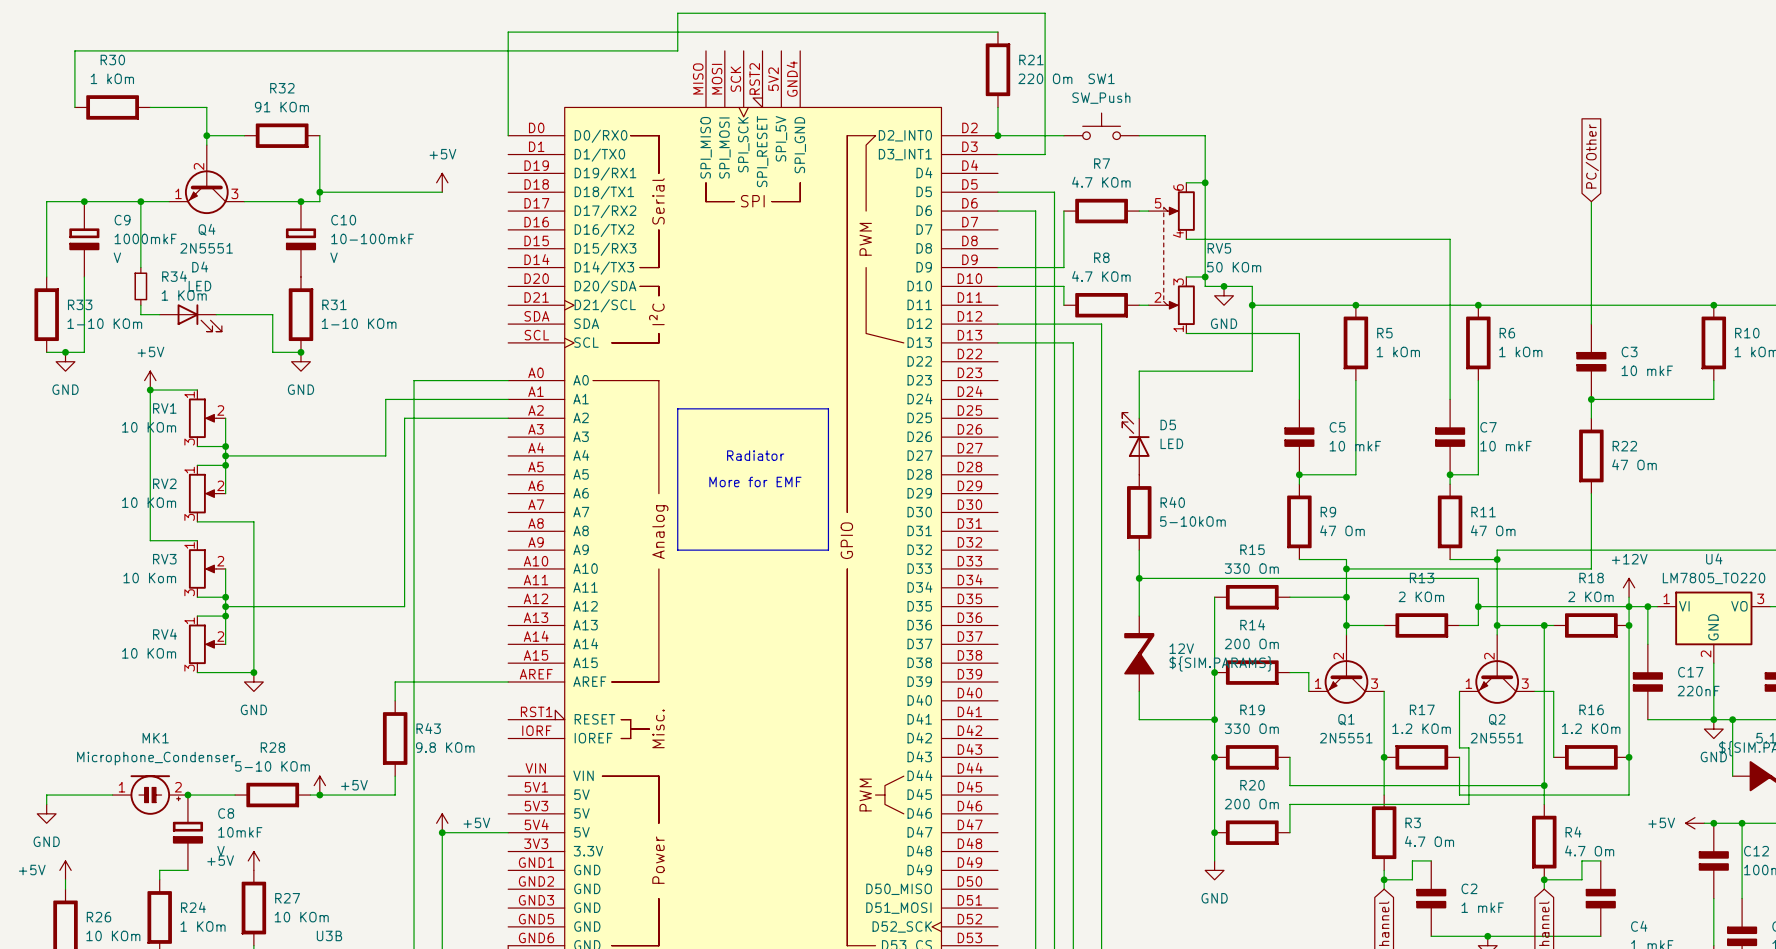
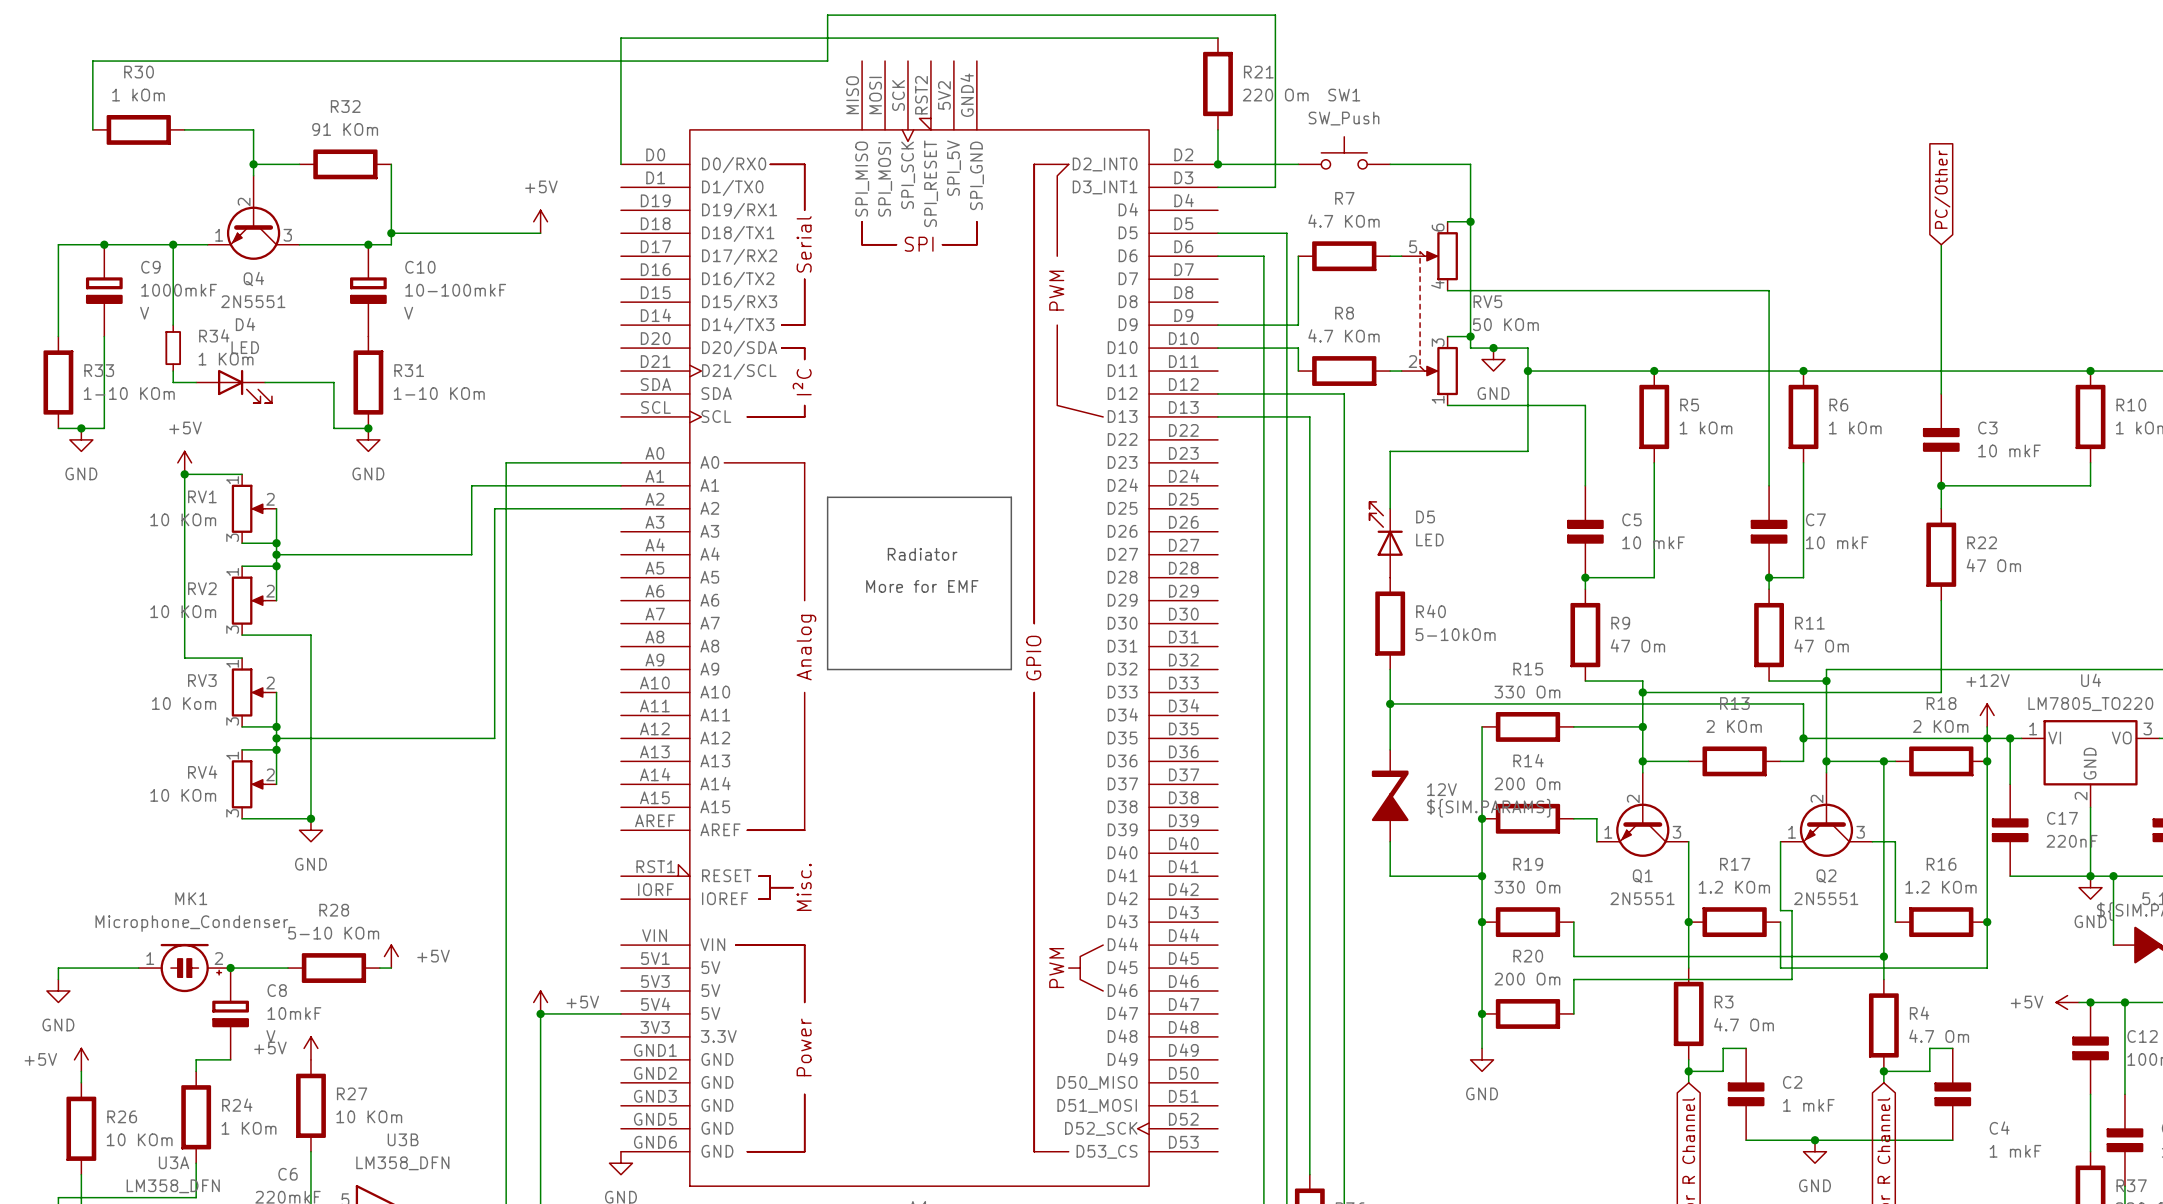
wire: (508, 681) (395, 681) (395, 700) -> none
R43: 9.8 KOm (395, 738) -> none
wire: (395, 776) (395, 795) (319, 795) -> none
junction: (319, 795) -> none

